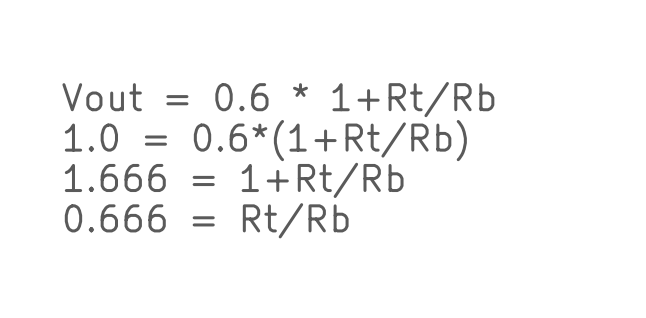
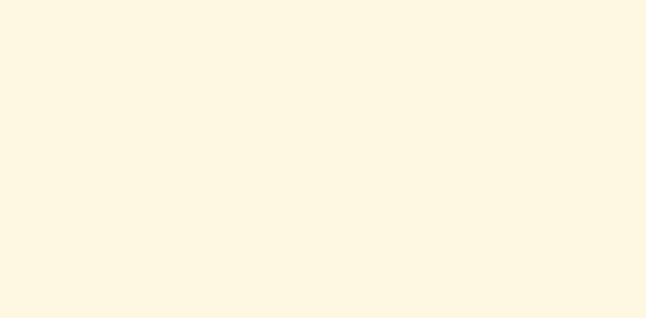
text: Vout = 0.6 * 1+Rt/Rb (278, 99) -> none
text: 1.0 = 0.6*(1+Rt/Rb) (265, 140) -> none
text: 1.666 = 1+Rt/Rb (234, 180) -> none
text: 0.666 = Rt/Rb (206, 220) -> none

